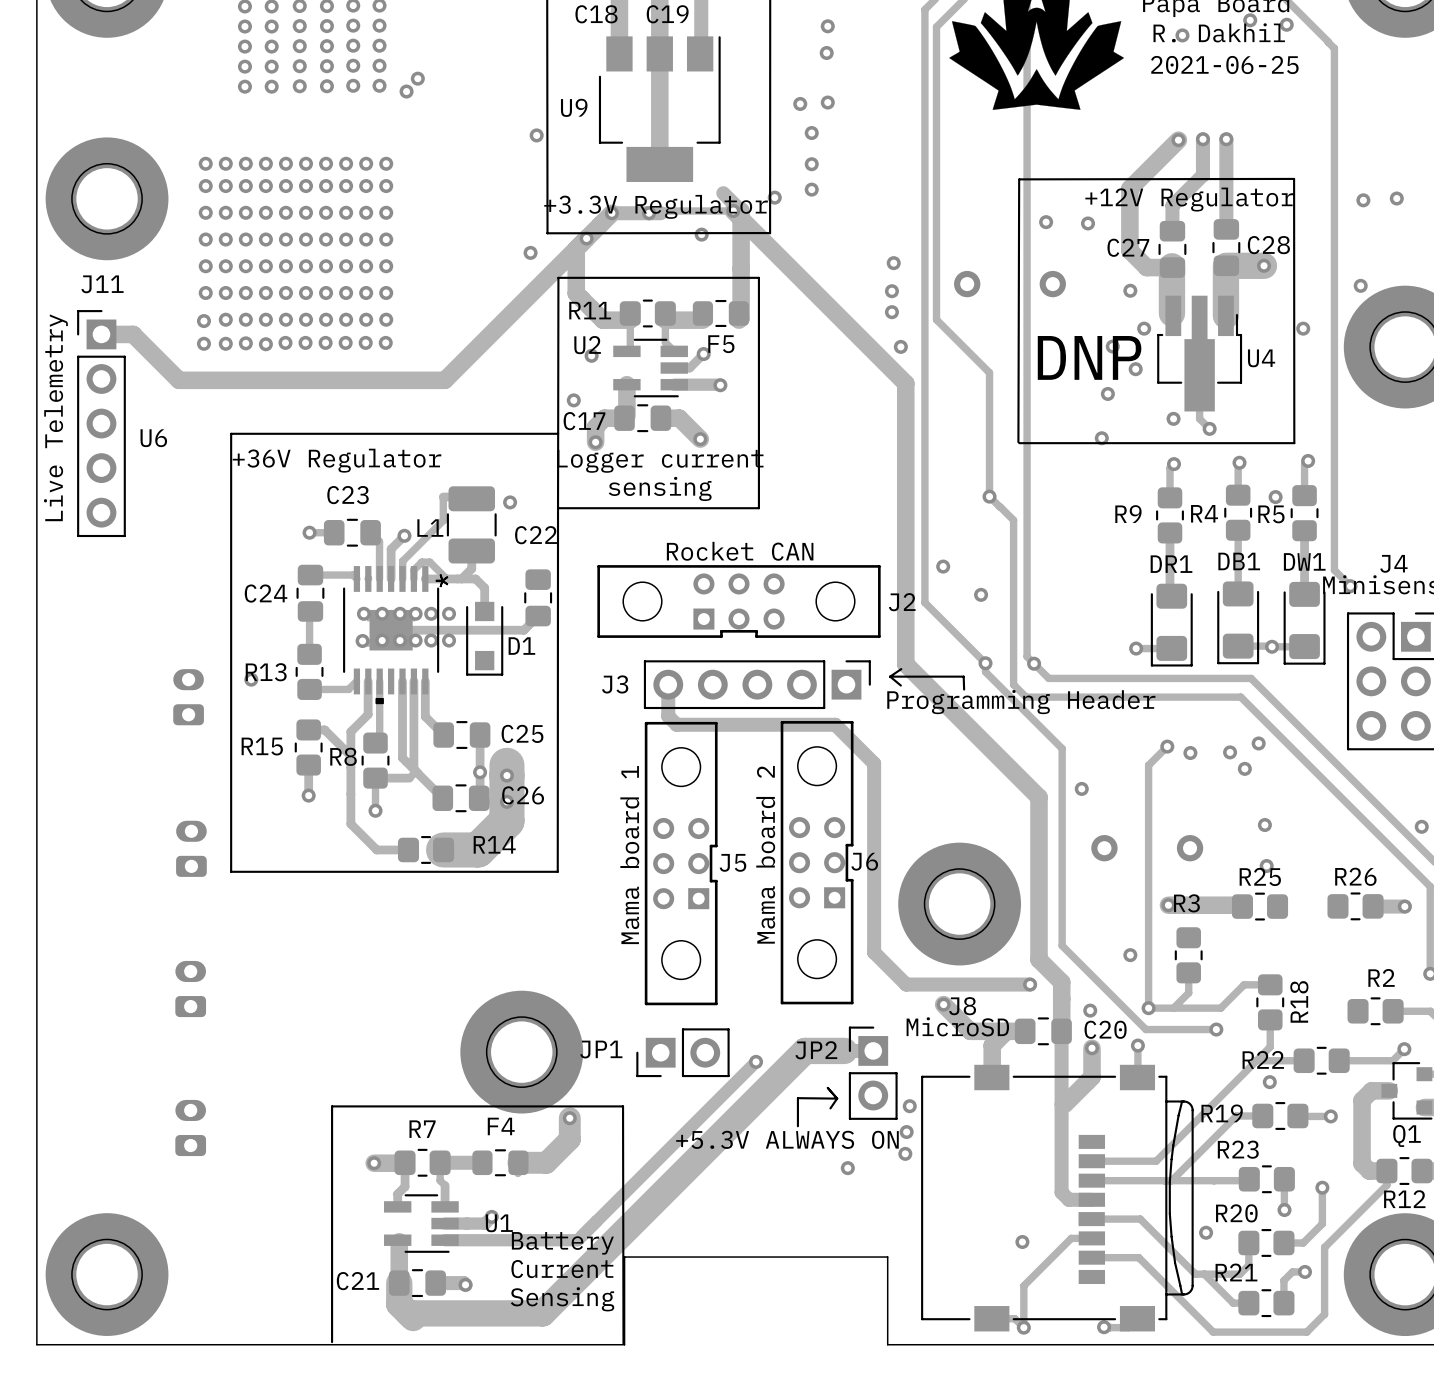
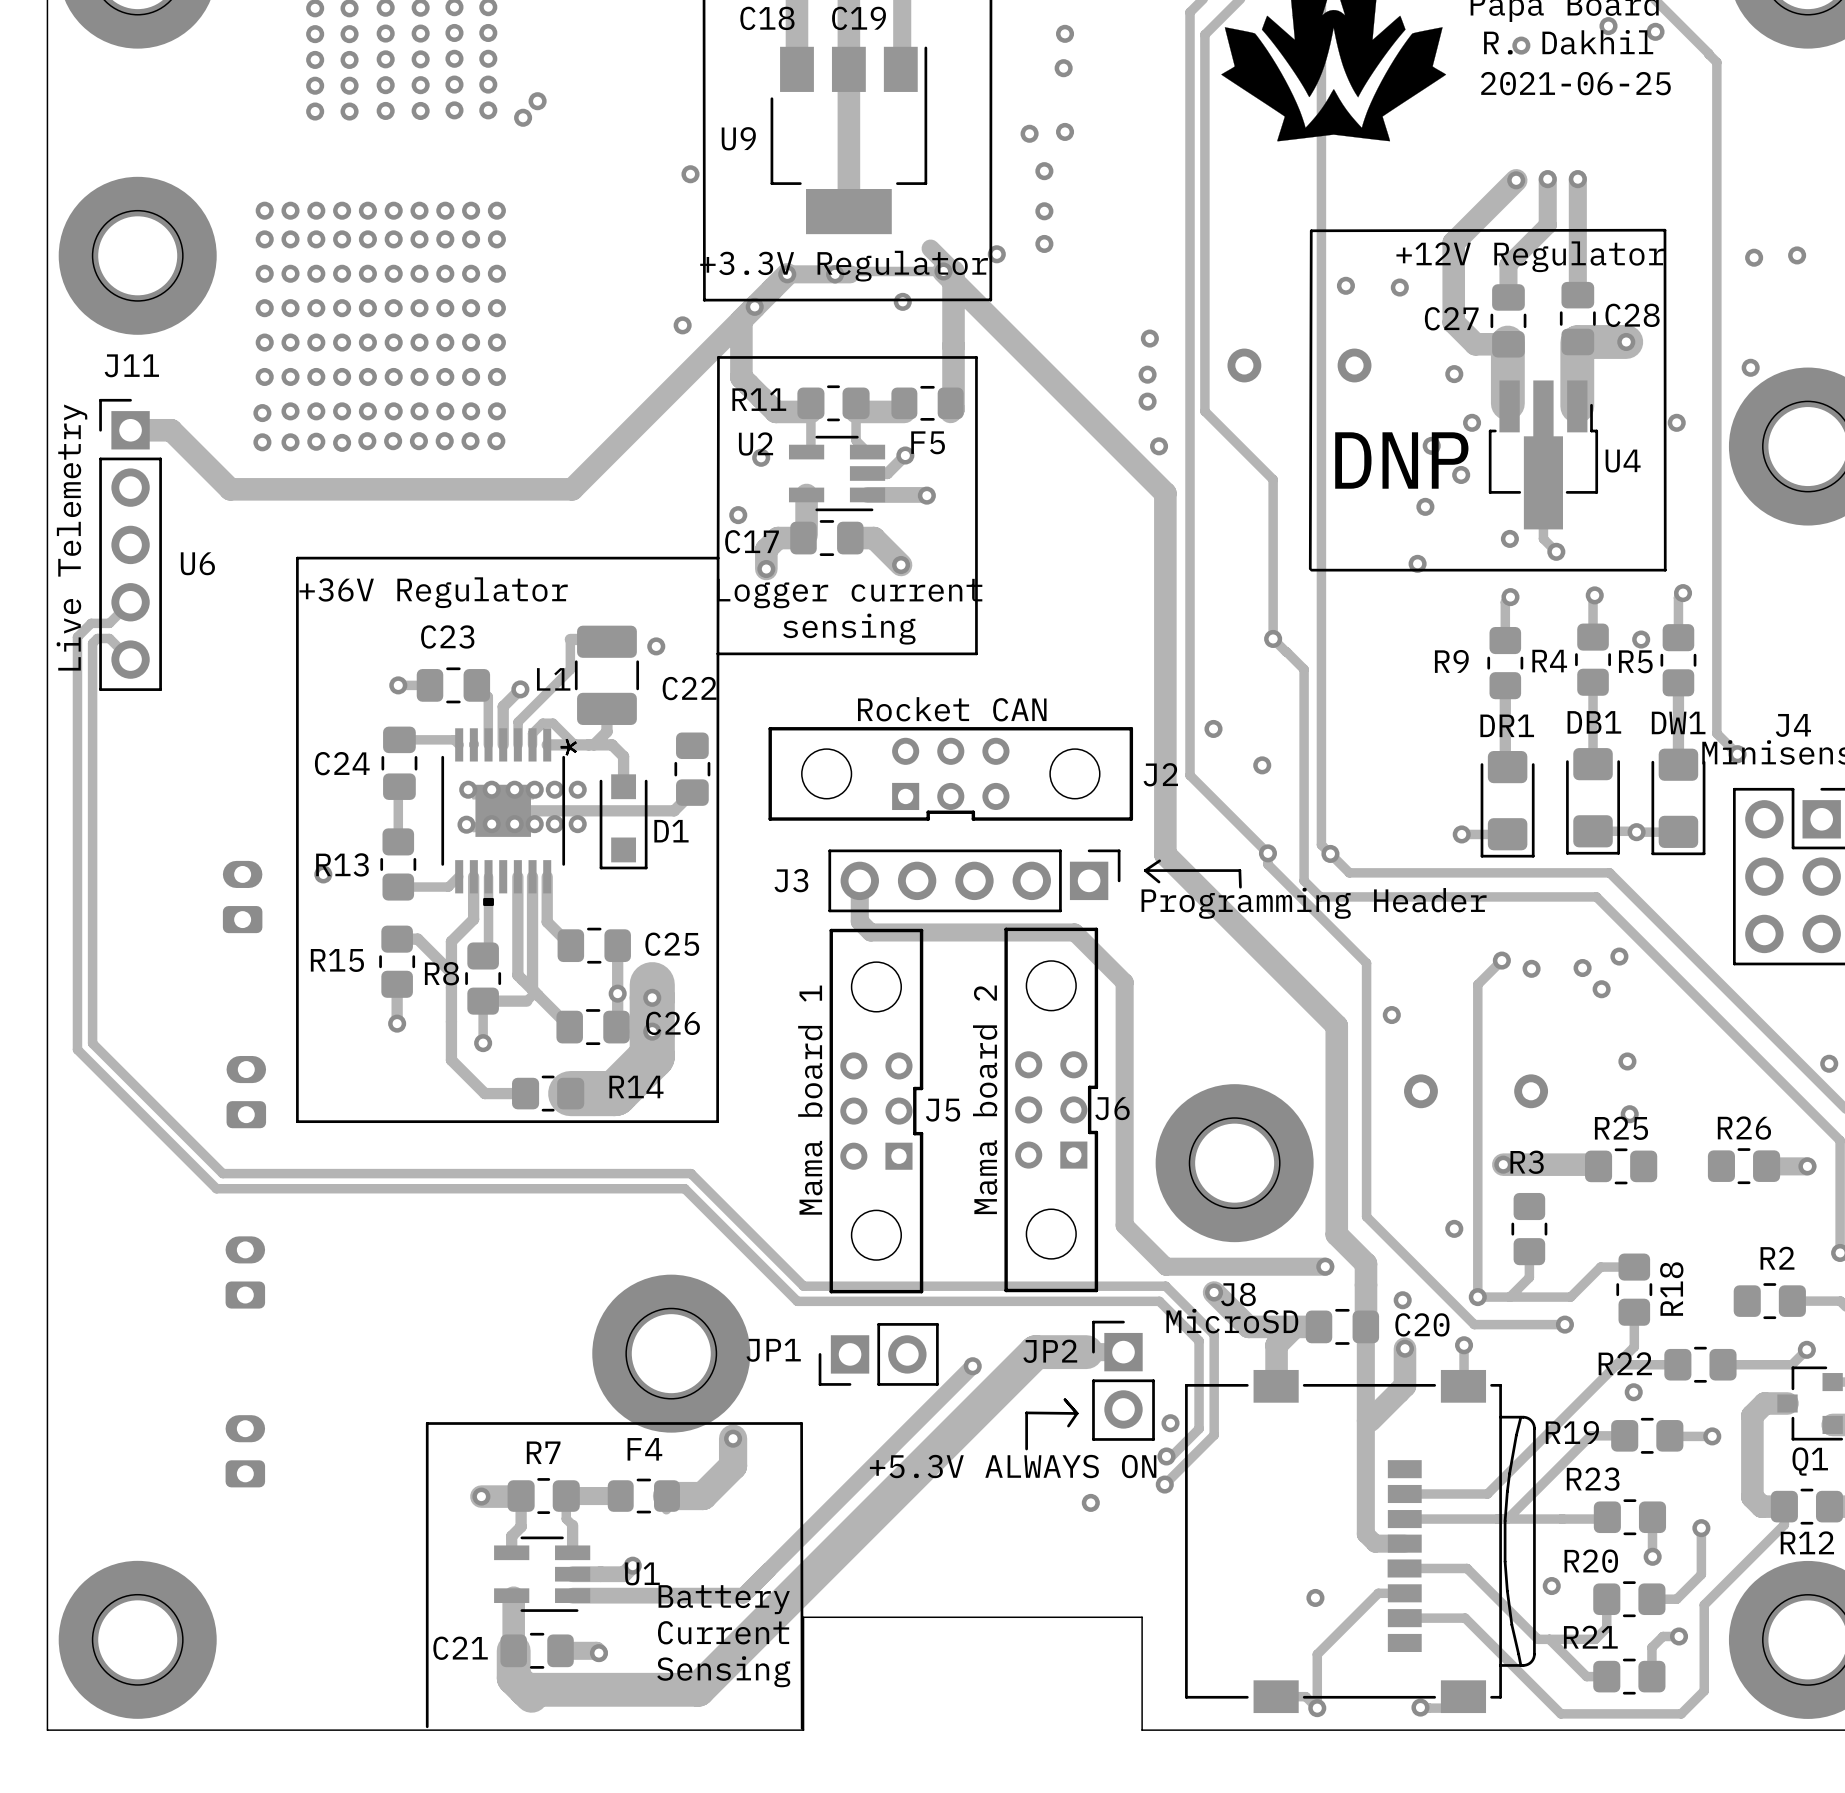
track: none -> (130, 602) (109, 623) (91, 623) (77, 637) (77, 1049) (216, 1188) (684, 1188) (797, 1301) (1159, 1301) (1199, 1340) (1199, 1428) (1171, 1456) (1166, 1456)
track: none -> (130, 659) (109, 638) (97, 638) (92, 643) (92, 1043) (222, 1173) (691, 1173) (803, 1286) (1165, 1286) (1214, 1334) (1214, 1435) (1164, 1484)

